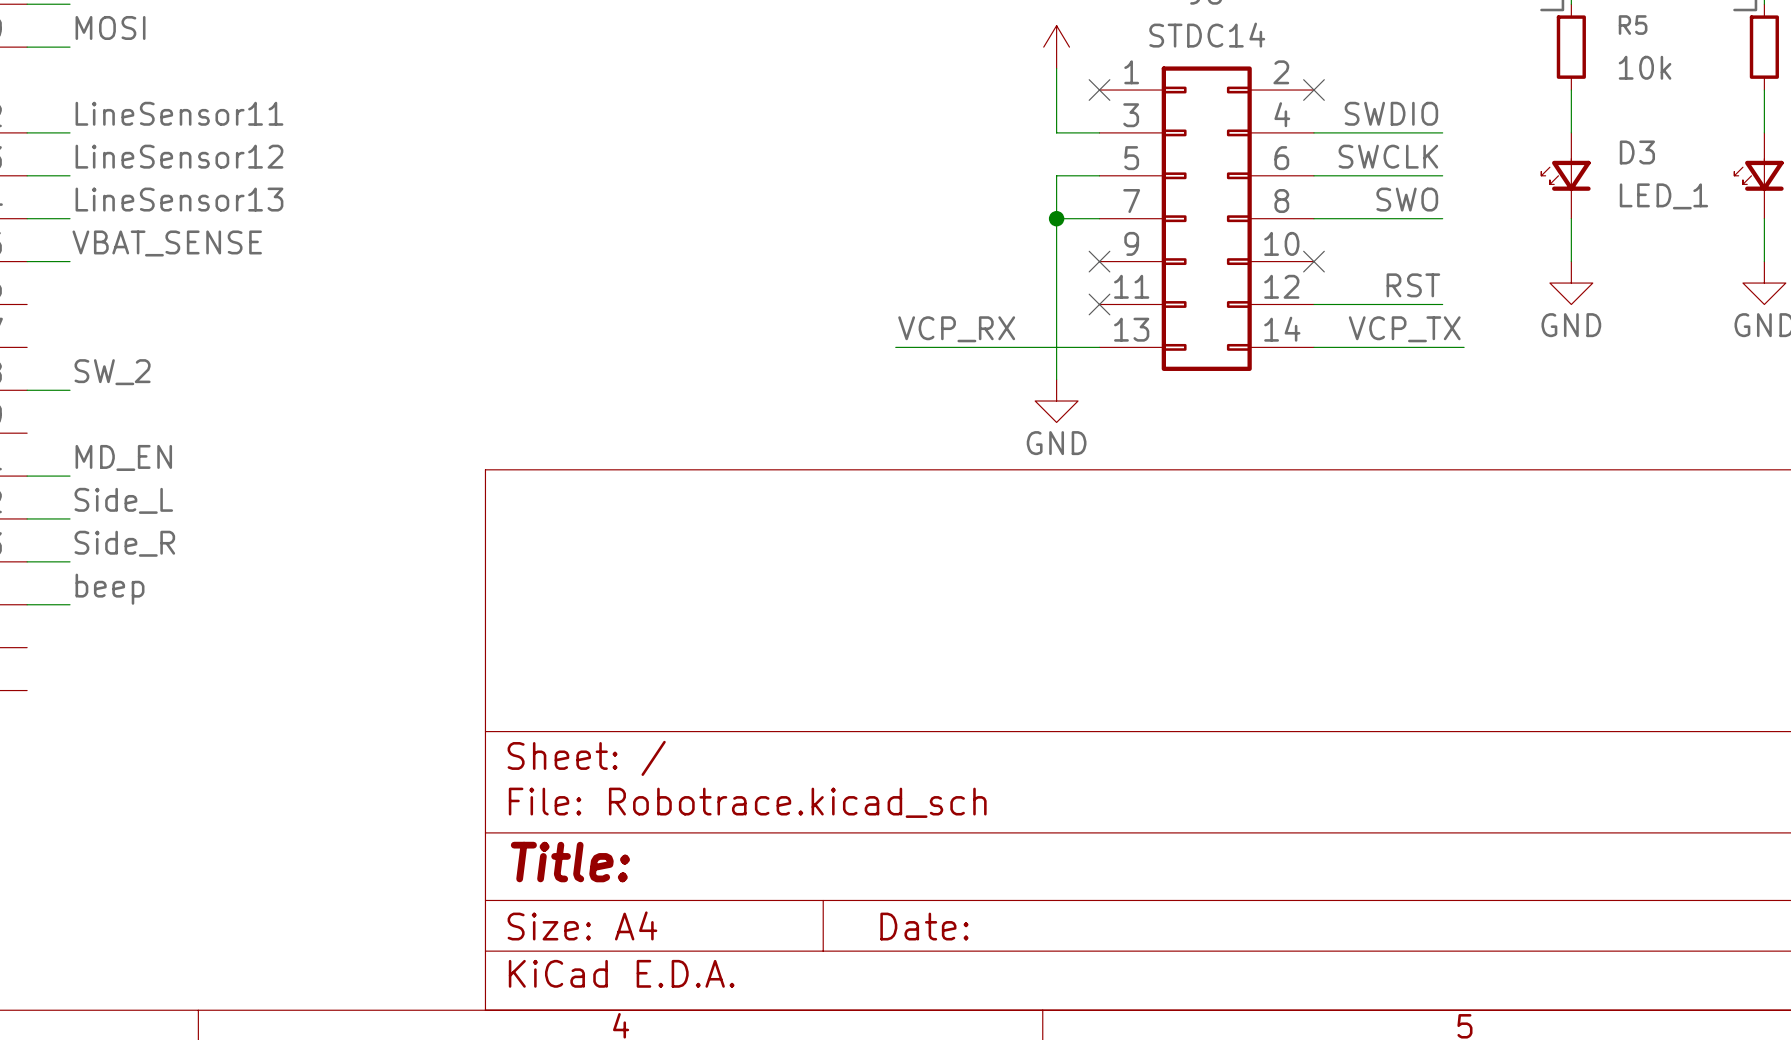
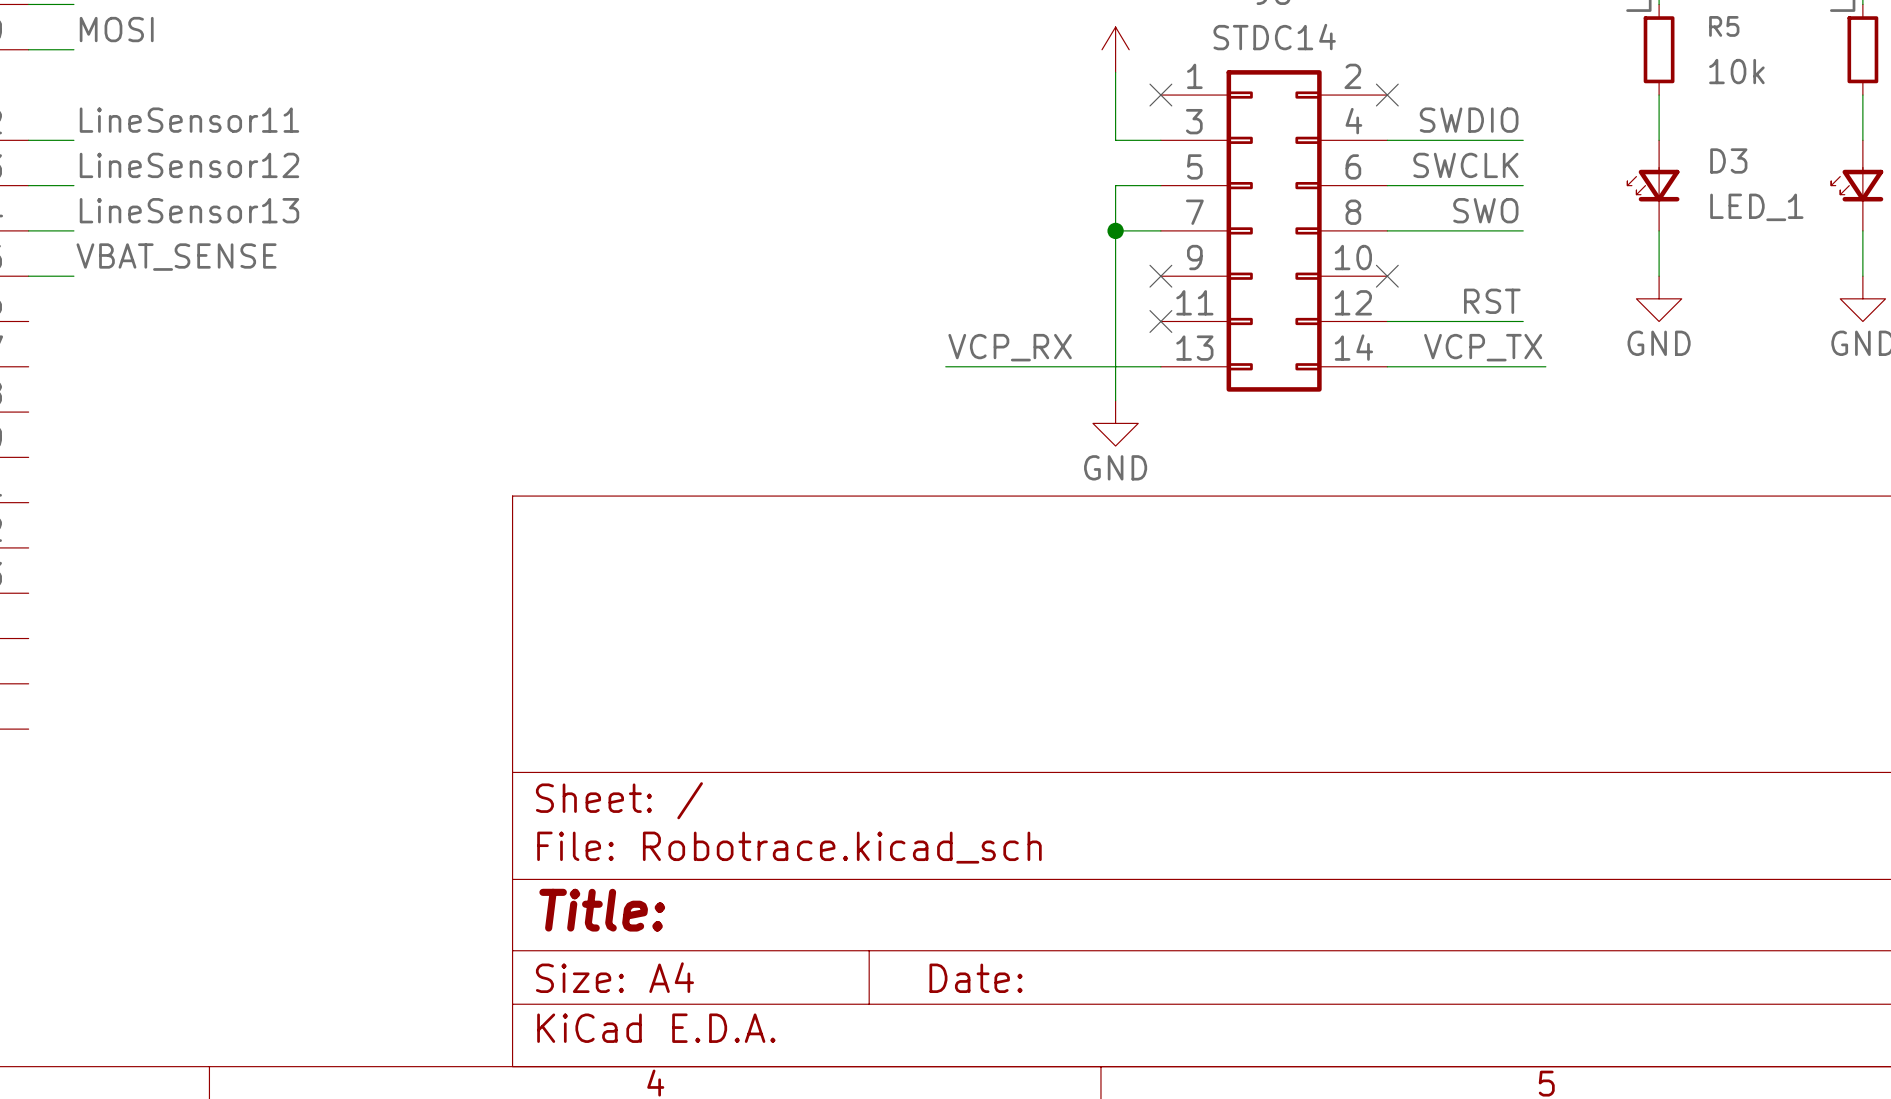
label: SW_2 (112, 372) -> none
wire: (27, 390) (70, 390) -> none
label: MD_EN (123, 457) -> none
wire: (27, 476) (70, 476) -> none
label: Side_L (123, 500) -> none
wire: (27, 518) (70, 518) -> none
label: Side_R (124, 543) -> none
wire: (27, 561) (70, 561) -> none
label: beep (110, 589) -> none
wire: (27, 604) (70, 604) -> none

